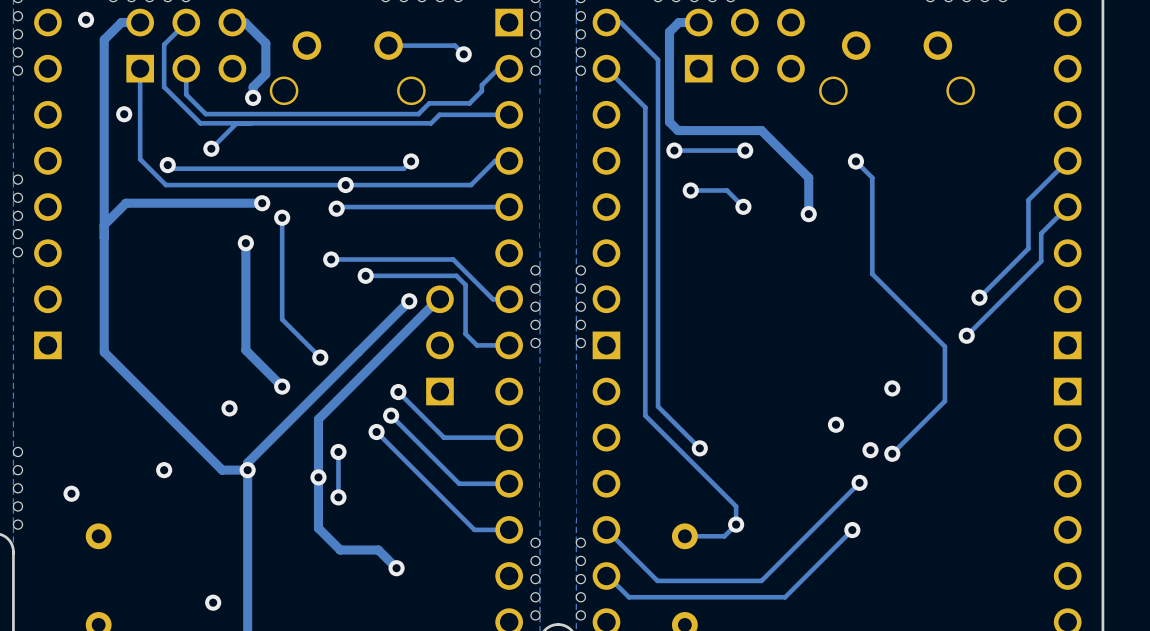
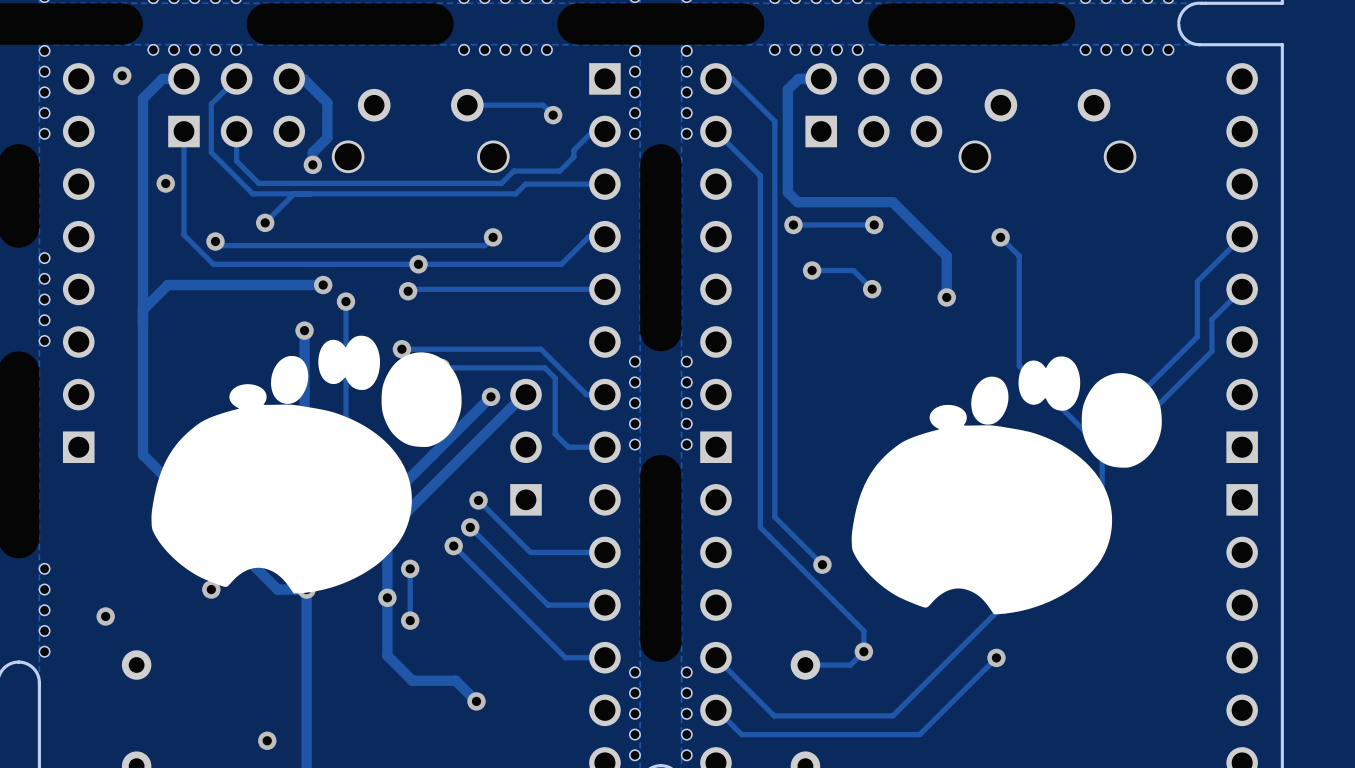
drawing: none -> [151, 335, 462, 594]
drawing: none -> [851, 356, 1162, 615]

